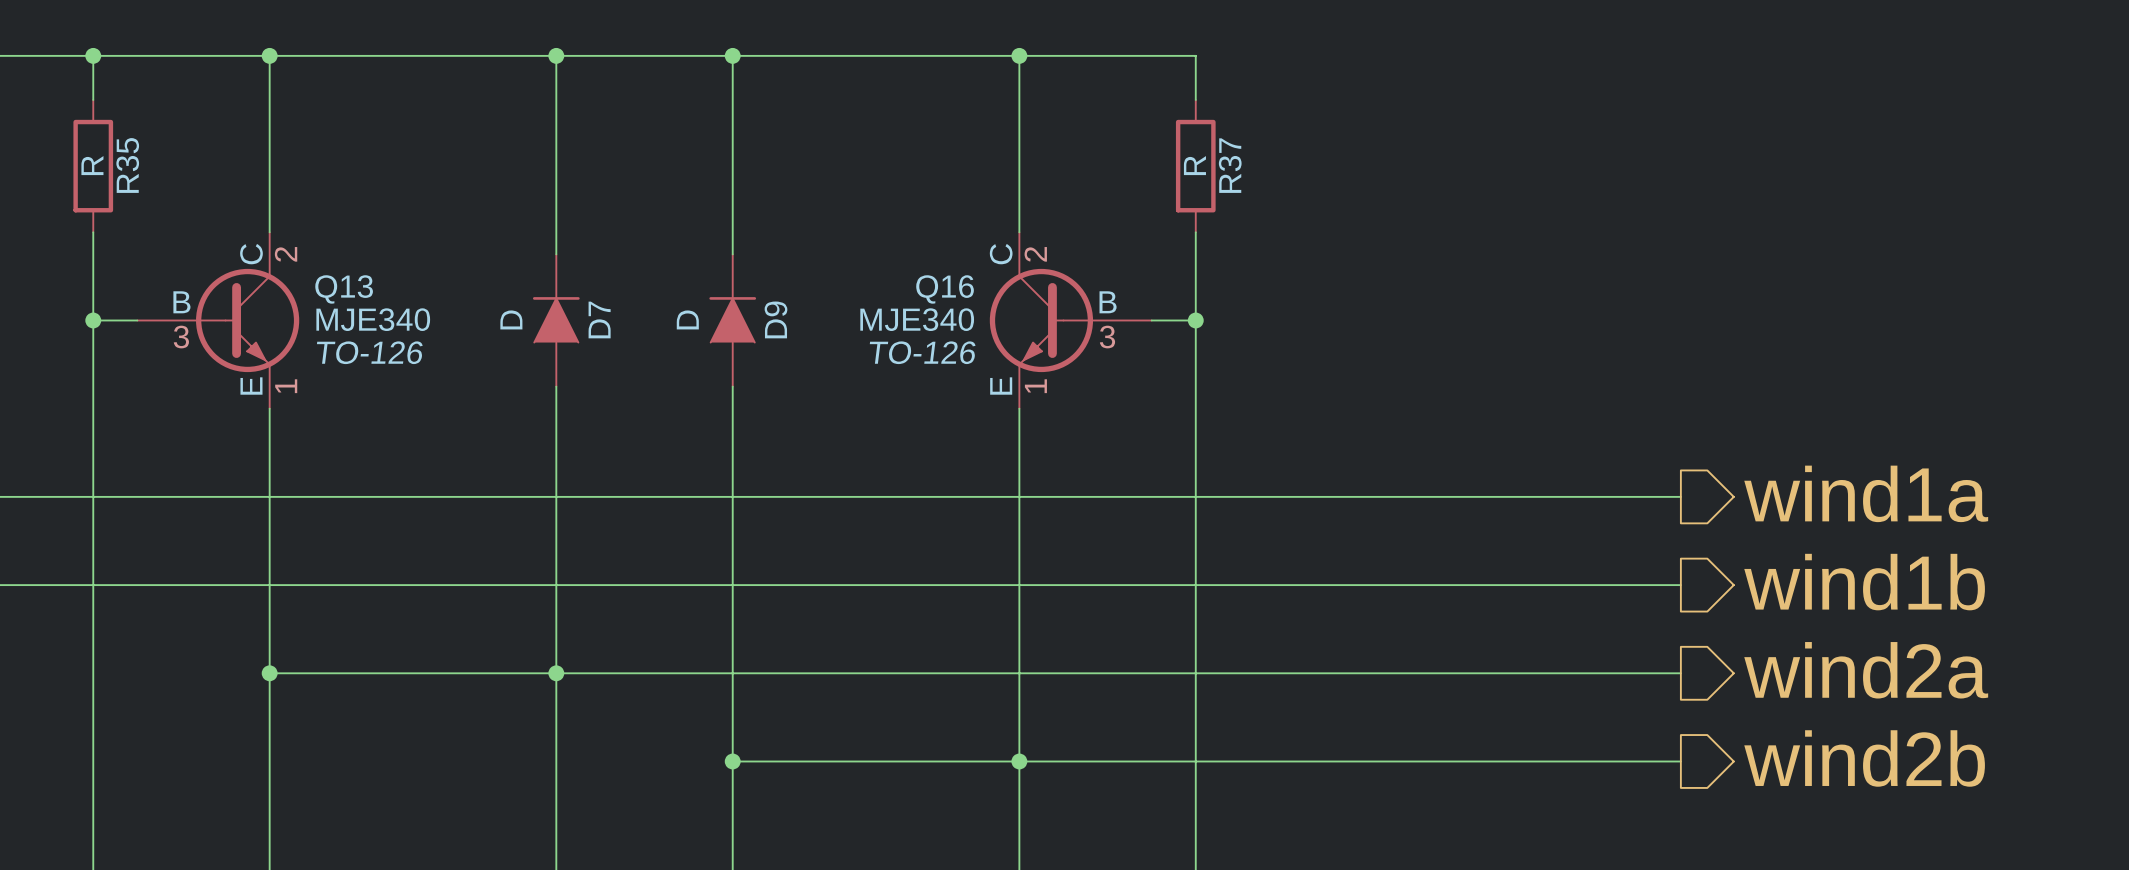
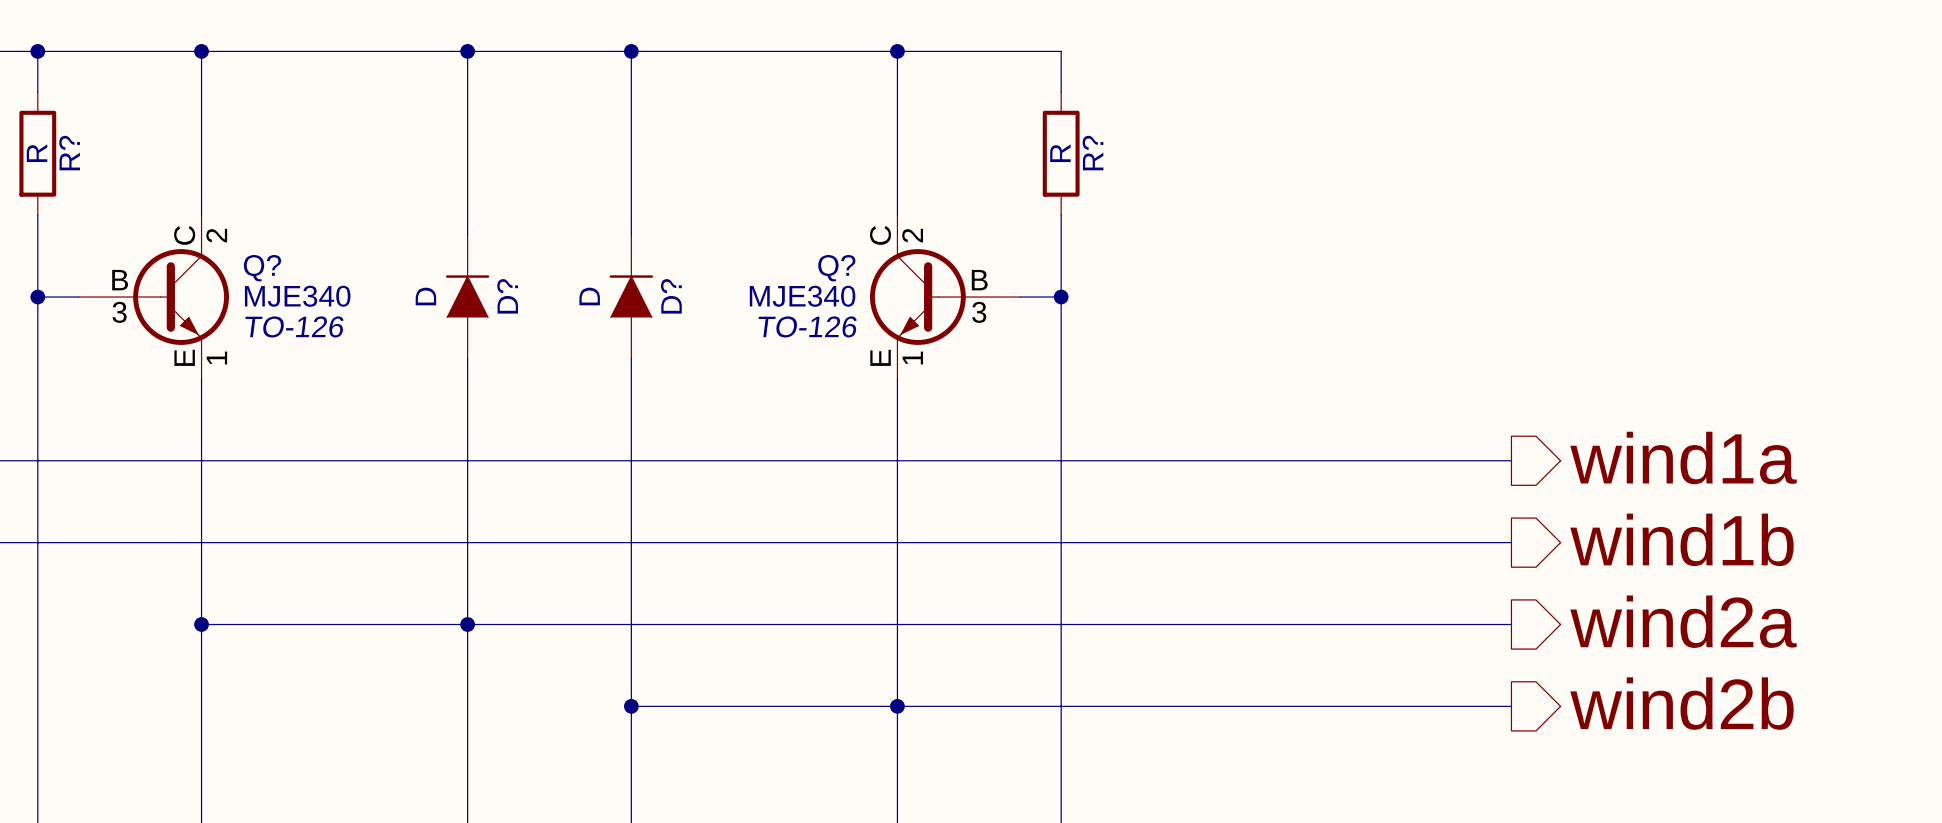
R35 name: R35 (127, 165) -> R? (69, 153)
R37 name: R37 (1230, 165) -> R? (1093, 153)
Q13 name: Q13 (344, 289) -> Q? (262, 268)
Q16 name: Q16 (945, 289) -> Q? (836, 268)
D7 name: D7 (599, 319) -> D? (507, 296)
D9 name: D9 (775, 319) -> D? (671, 296)

